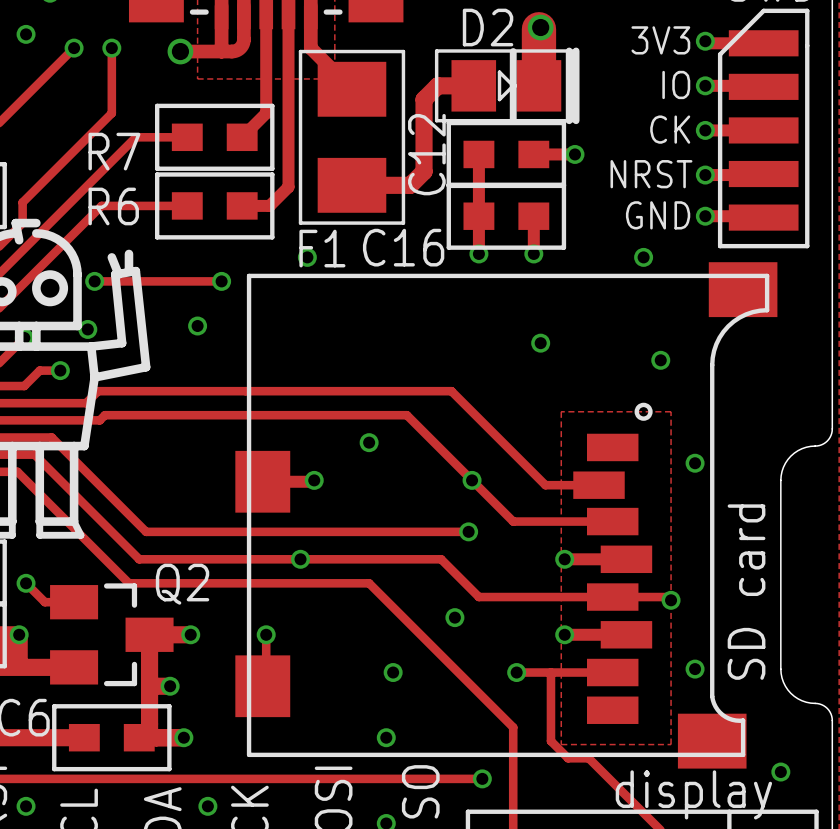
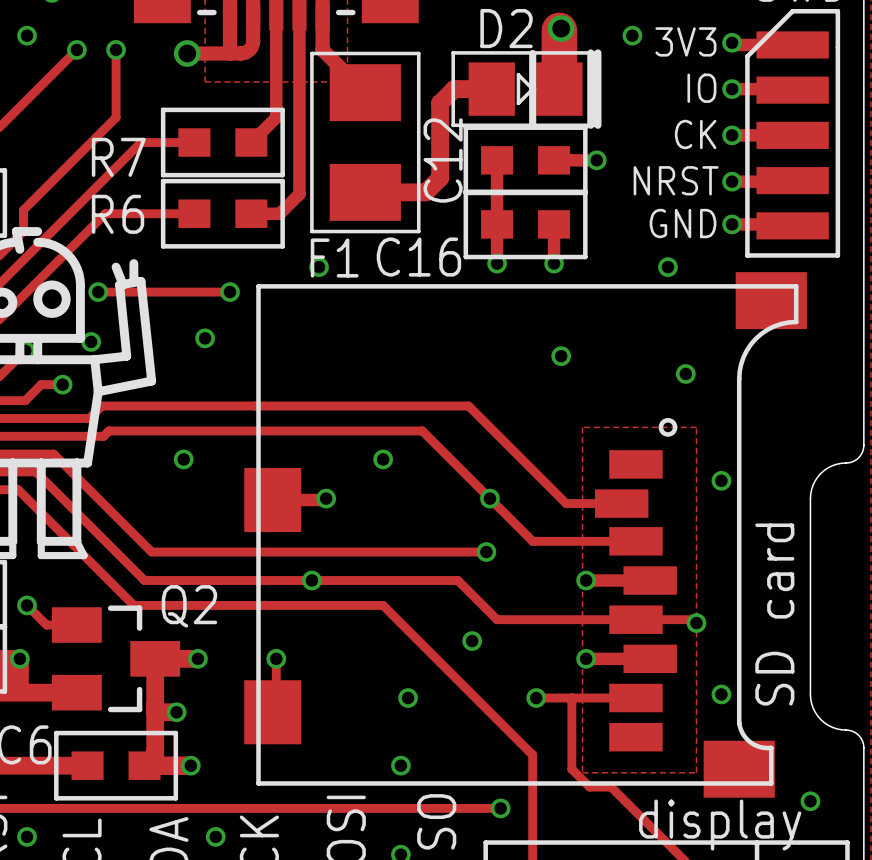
via: none -> (632, 35)
via: none -> (183, 459)

